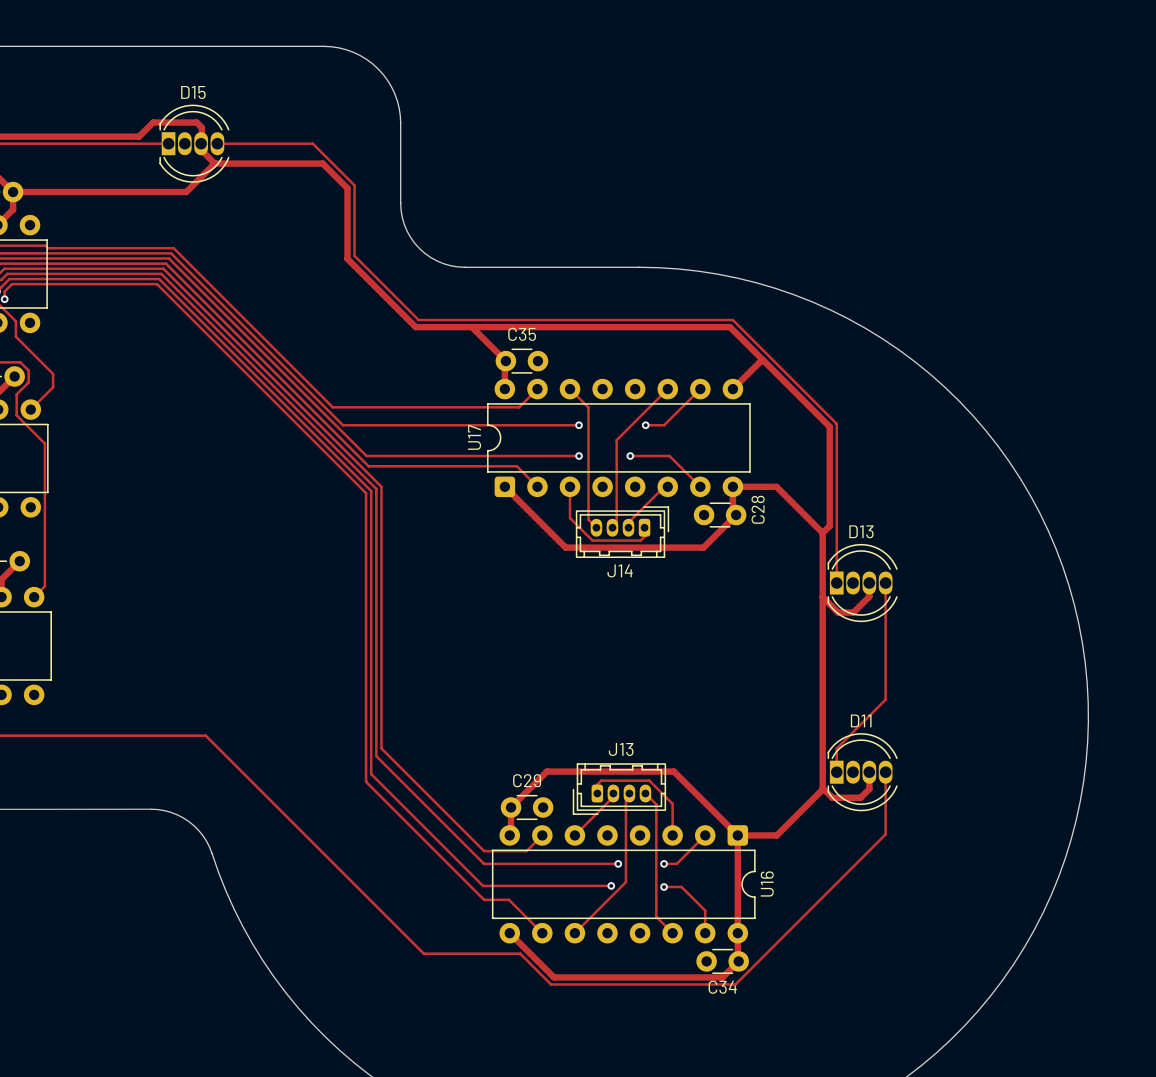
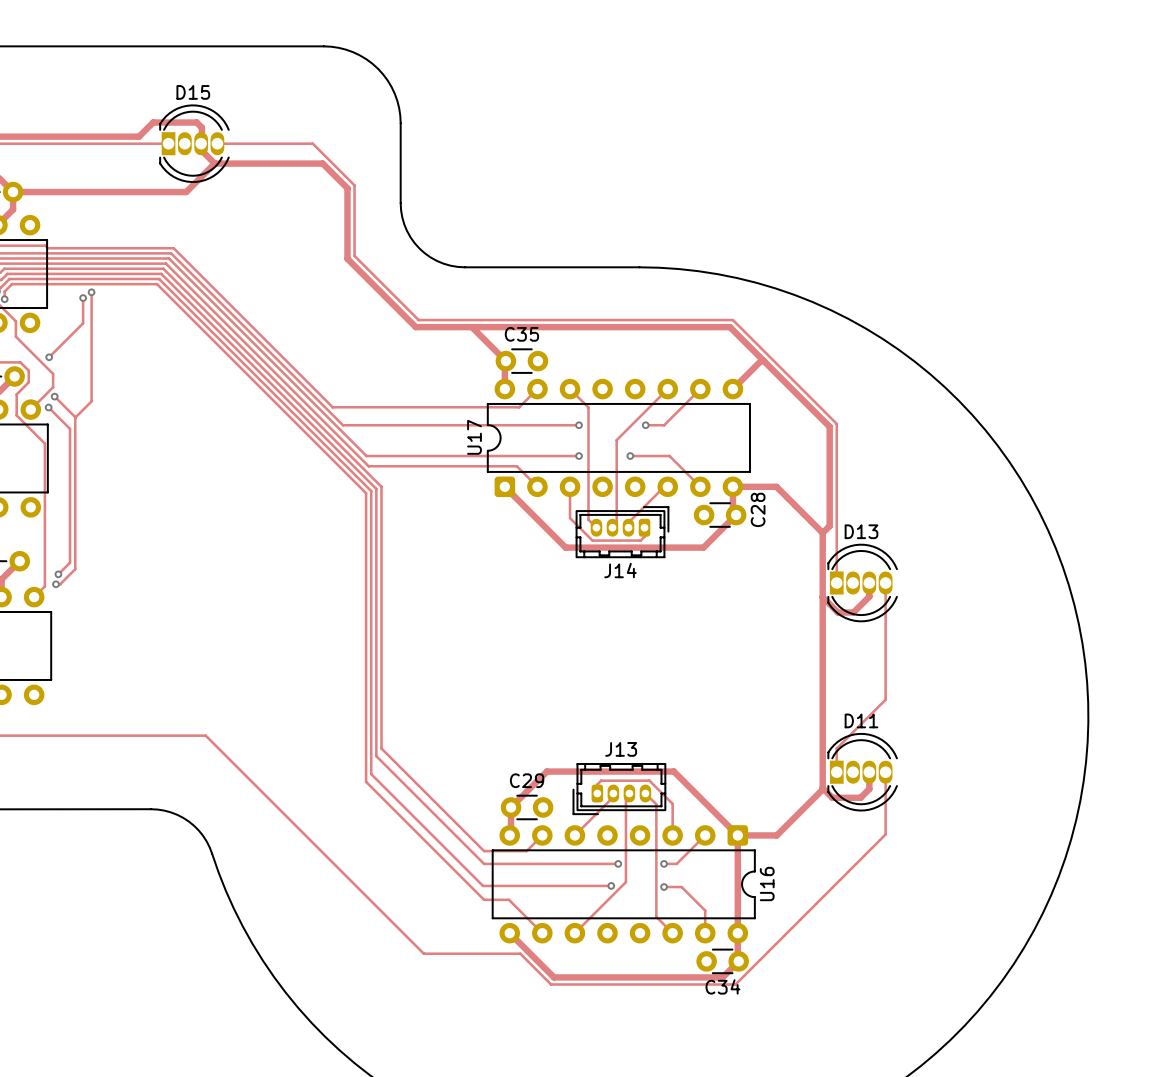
track: none -> (91, 292) (91, 401) (75, 417)
via: none -> (91, 292)
track: none -> (83, 298) (83, 323) (49, 357)
via: none -> (83, 298)
via: none -> (49, 357)
track: none -> (54, 396) (75, 417) (75, 569) (60, 584) (55, 584)
via: none -> (54, 396)
track: none -> (48, 407) (70, 428) (70, 562) (58, 574)
via: none -> (48, 407)
via: none -> (58, 574)
via: none -> (55, 584)

